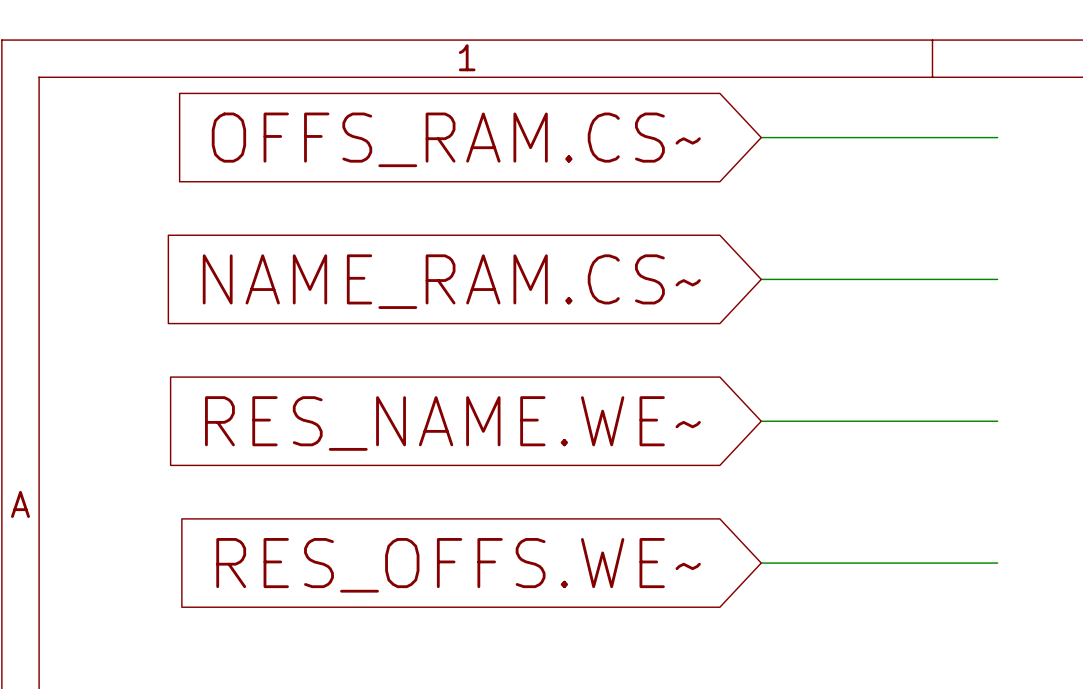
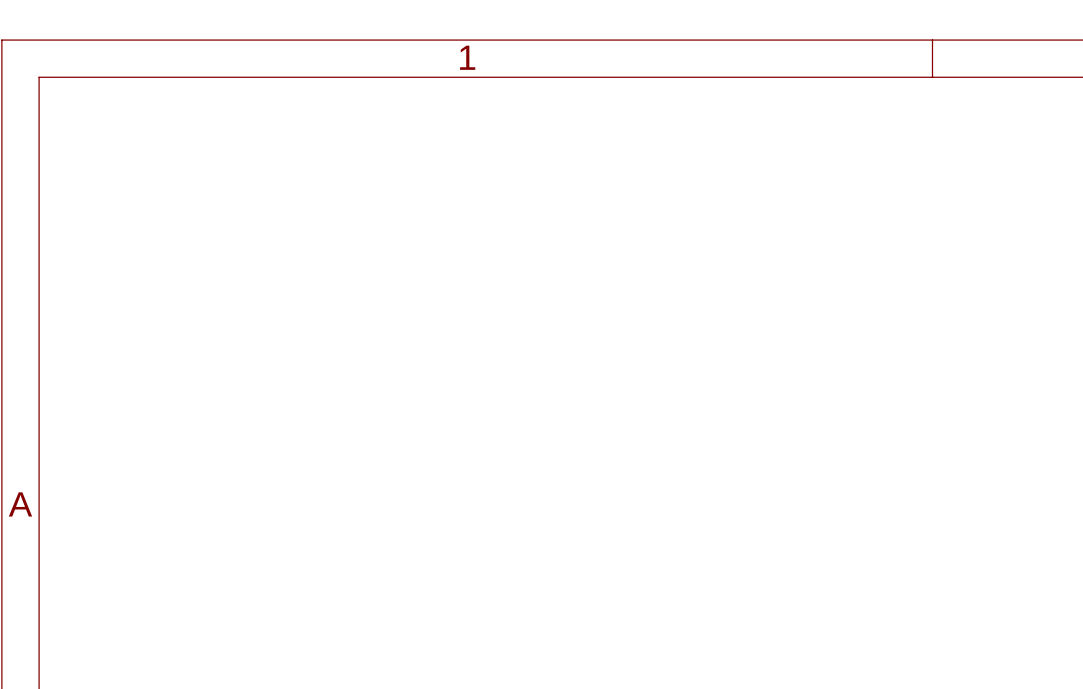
wire: (761, 137) (997, 137) -> none
global label: OFFS_RAM.CS~ (456, 139) -> none
wire: (761, 279) (997, 279) -> none
global label: NAME_RAM.CS~ (451, 281) -> none
wire: (761, 421) (997, 421) -> none
global label: RES_NAME.WE~ (452, 423) -> none
wire: (761, 563) (997, 563) -> none
global label: RES_OFFS.WE~ (458, 565) -> none

